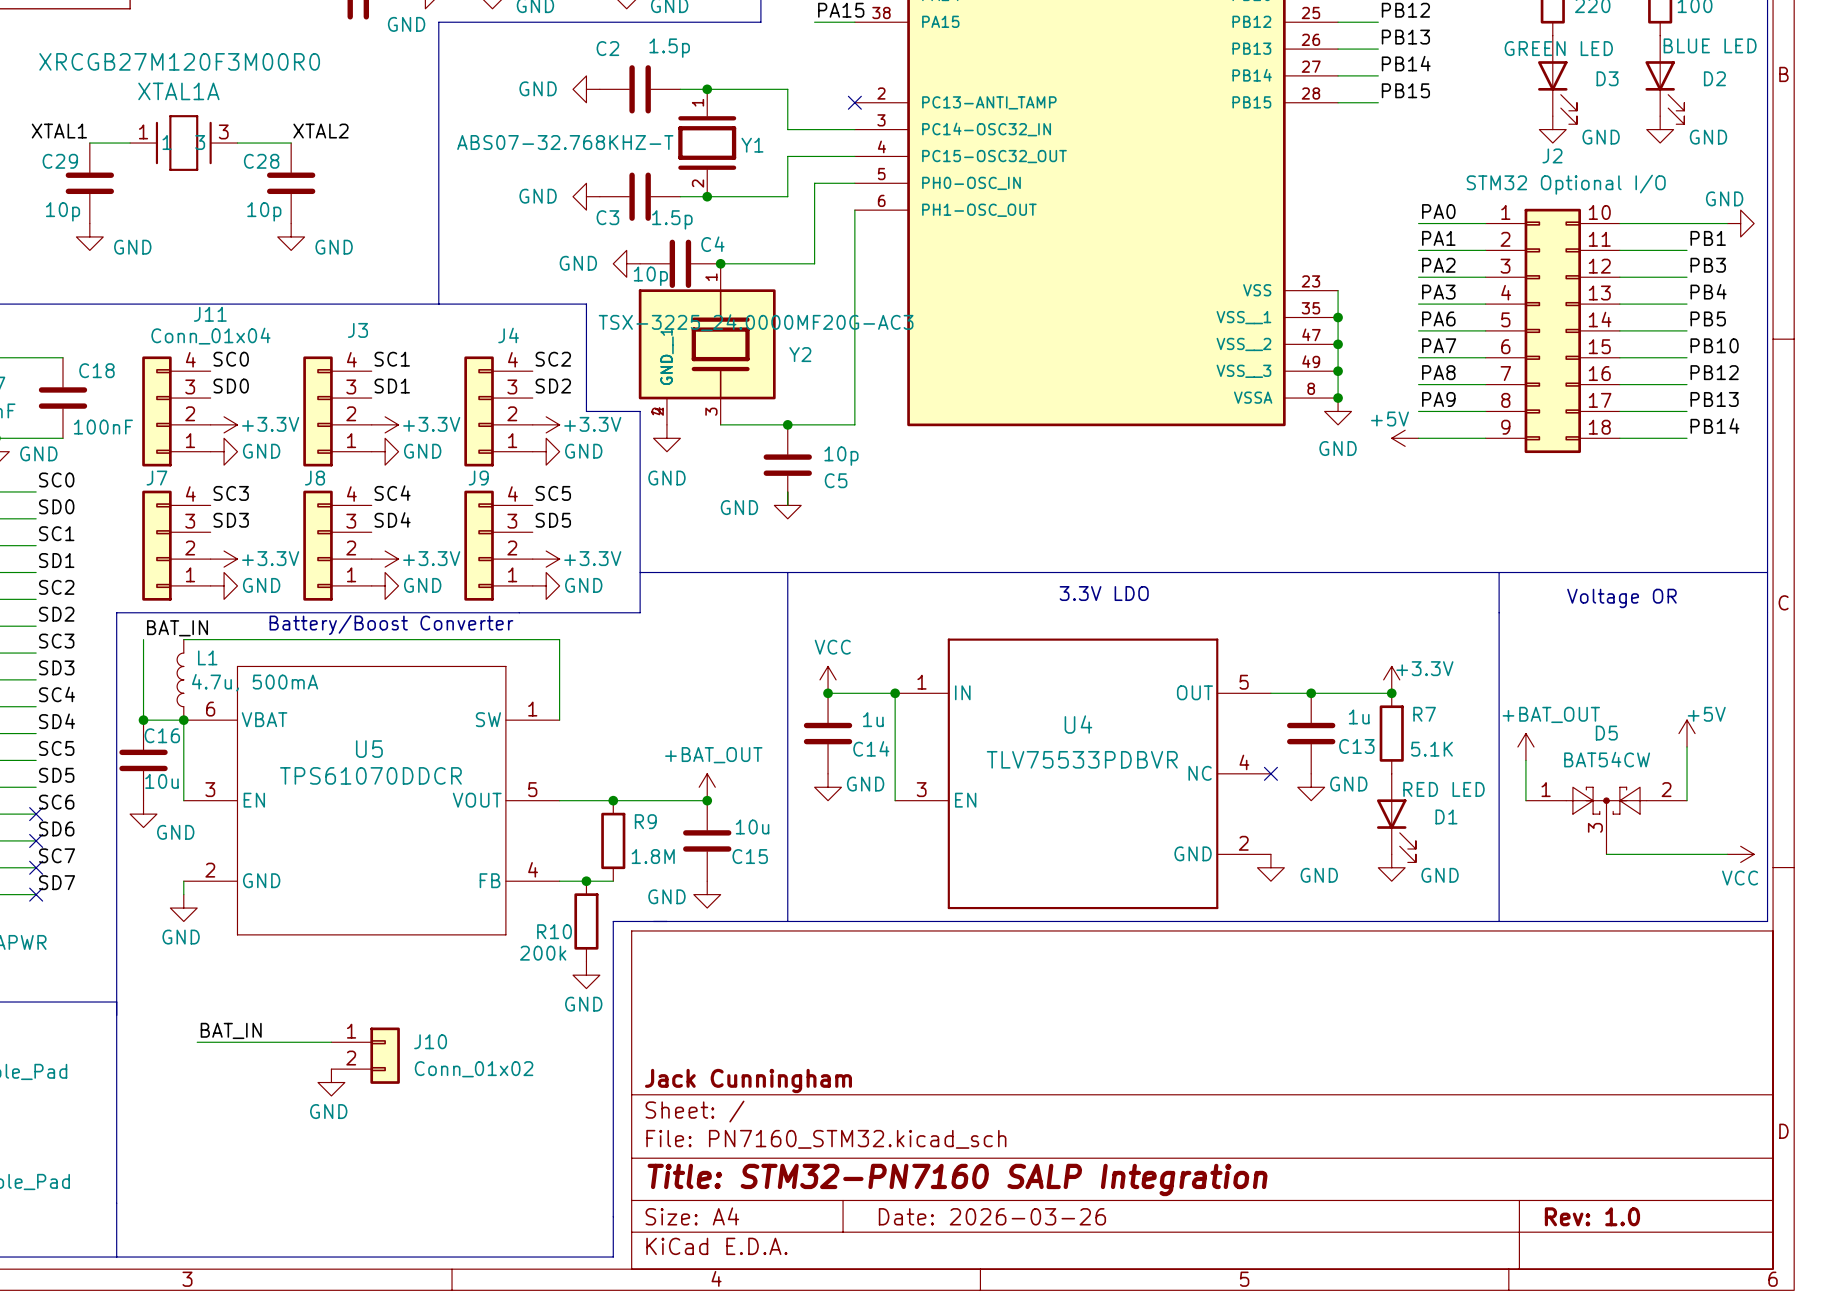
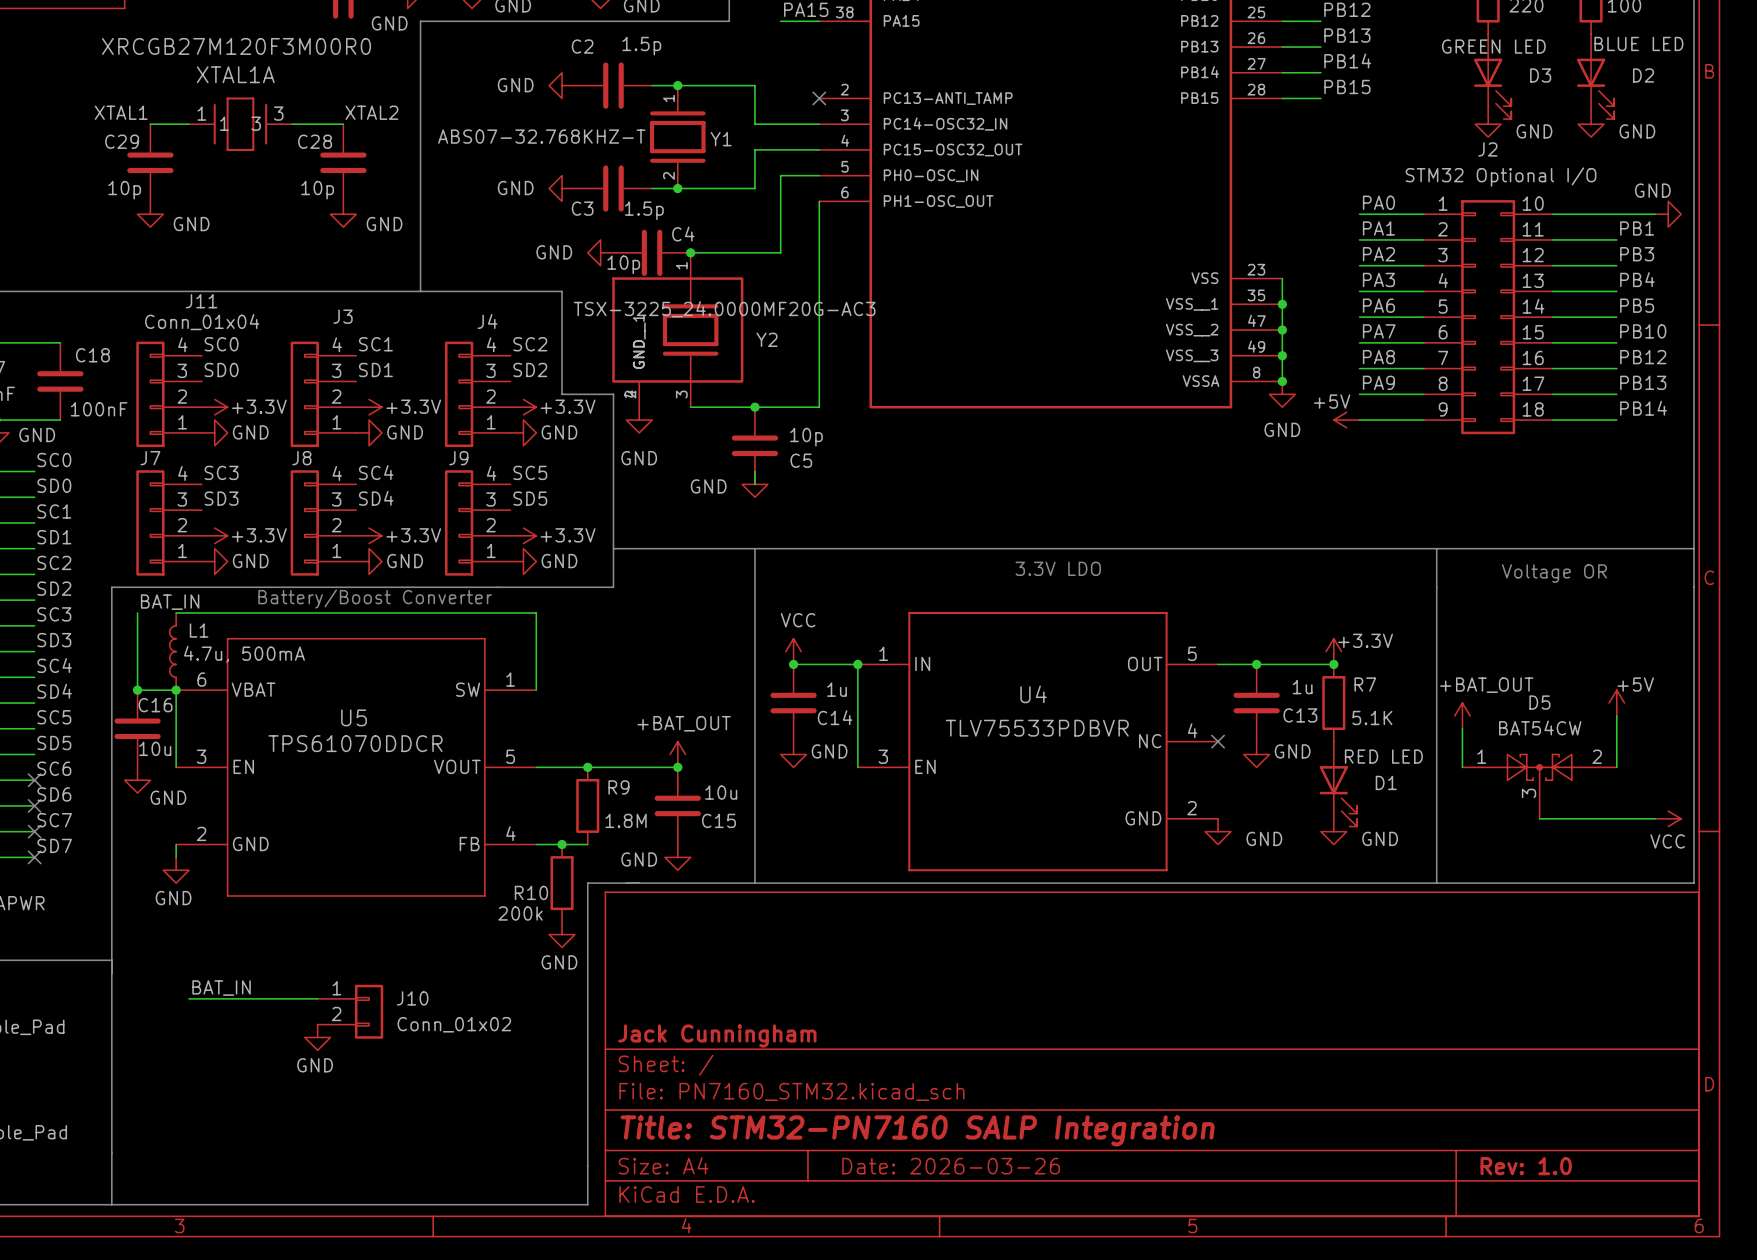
label position: XTAL1 (59, 131) -> XTAL1 (121, 112)
label position: XTAL2 (320, 131) -> XTAL2 (371, 112)
wire: (89, 143) (130, 143) -> (150, 124) (189, 124)
XTAL1A position: (183, 143) -> (240, 124)
wire: (237, 143) (291, 143) -> (291, 124) (343, 124)
C29 position: (89, 183) -> (150, 162)
C28 position: (291, 183) -> (343, 162)
power symbol: none -> GND (150, 214)
power symbol: none -> GND (343, 214)
power symbol: GND (89, 236) -> none
power symbol: GND (291, 236) -> none

